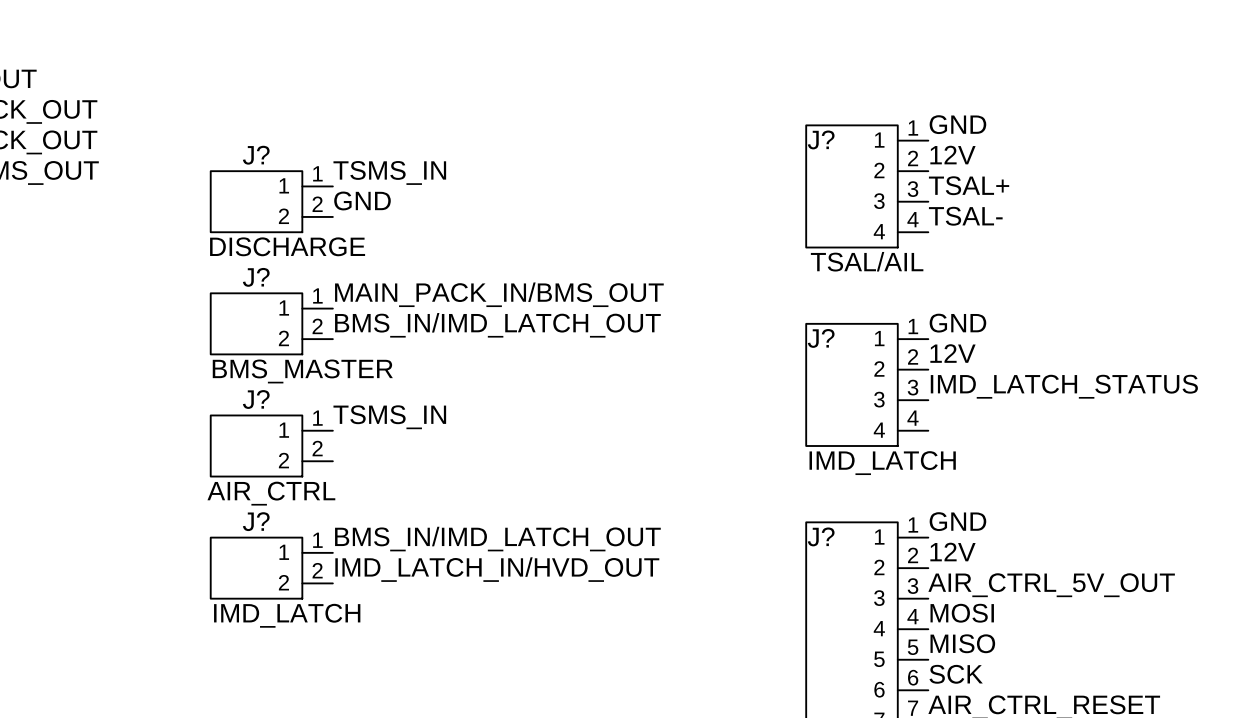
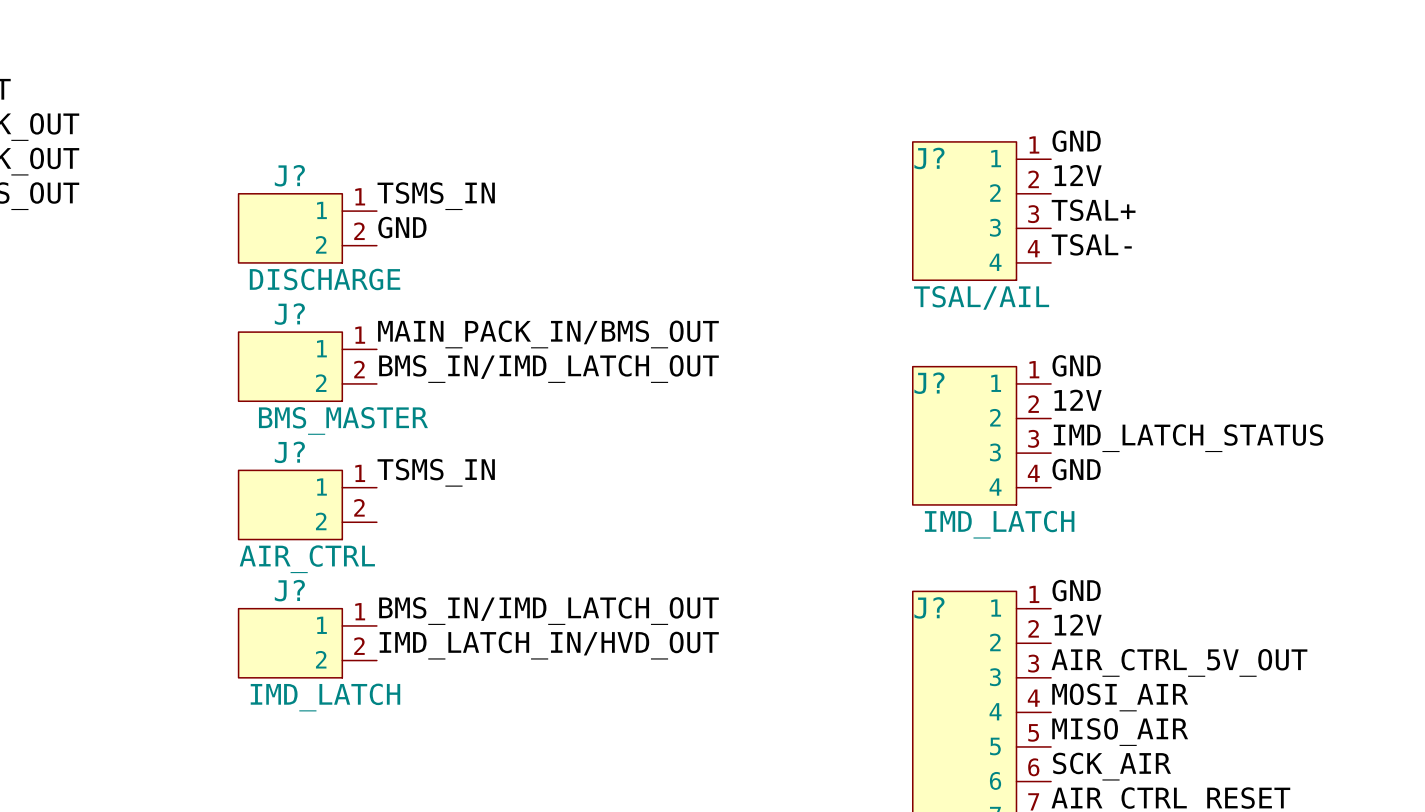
label: none -> GND (1076, 469)
label: MOSI (962, 613) -> MOSI_AIR (1120, 697)
label: MISO (962, 643) -> MISO_AIR (1120, 732)
label: SCK (956, 674) -> SCK_AIR (1111, 766)

